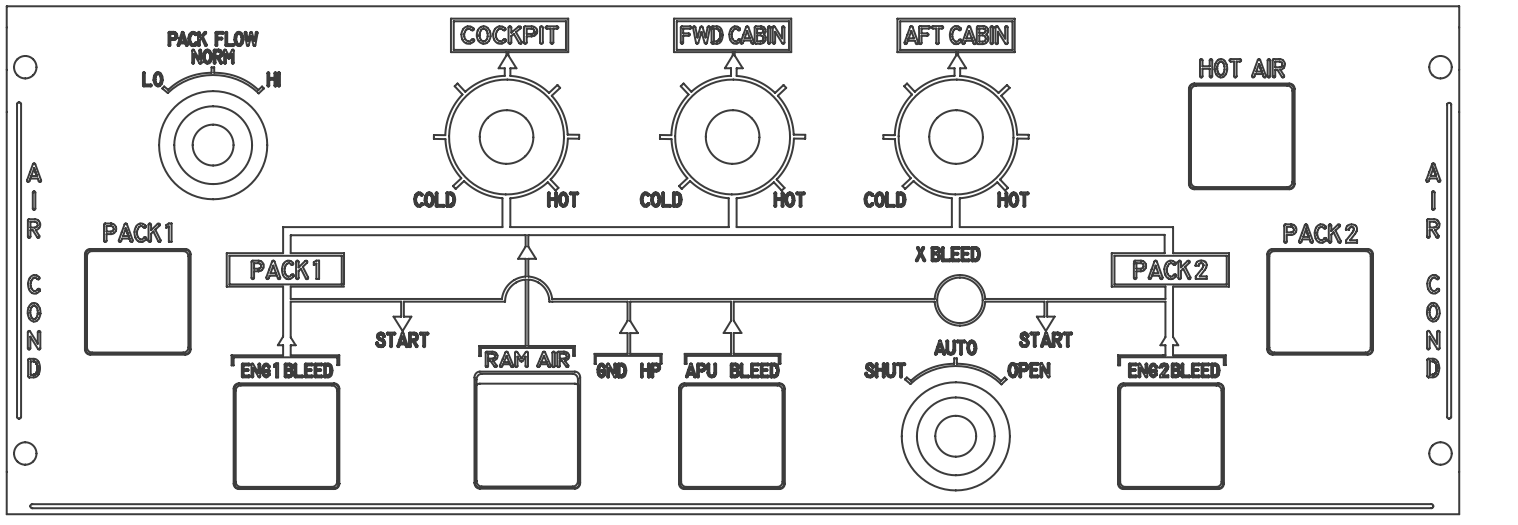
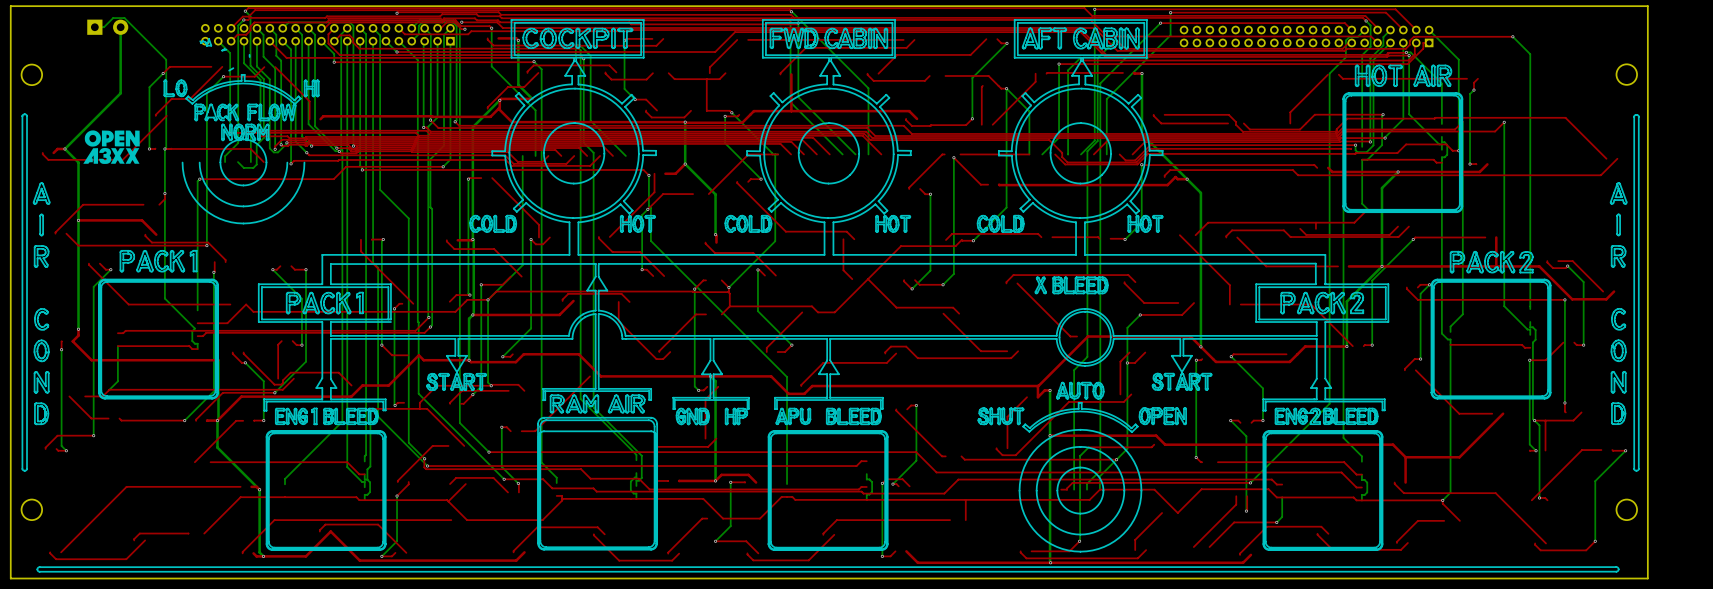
line: (6, 6) (6, 514) (1459, 514) (1459, 6) (6, 6) -> none
board edge: none -> (10, 6) (1647, 6) (1647, 578) (10, 578) (10, 6)
top track: none -> (1094, 9) (1395, 9) (1416, 30)
bottom track: none -> (1094, 9) (1094, 140) (1080, 154)
via: none -> (1094, 9)
top track: none -> (245, 11) (248, 8) (1084, 8) (1092, 15) (1365, 15) (1377, 30)
bottom track: none -> (245, 11) (250, 16) (250, 65) (263, 79) (263, 137) (256, 145) (256, 164) (253, 167) (243, 167) (237, 162)
via: none -> (245, 11)
top track: none -> (791, 11) (789, 10) (255, 10) (248, 16) (242, 16) (231, 28)
bottom track: none -> (791, 11) (868, 88) (868, 154)
via: none -> (791, 11)
top track: none -> (397, 13) (791, 14) (794, 17) (1091, 17)
via: none -> (397, 13)
top track: none -> (1170, 12) (1385, 12) (1403, 30)
bottom track: none -> (1170, 12) (1170, 35) (1106, 99) (1106, 154)
via: none -> (1170, 12)
top track: none -> (1091, 17) (1363, 17) (1366, 20)
top track: none -> (327, 18) (441, 18)
top track: none -> (243, 19) (250, 17) (325, 17) (327, 16) (440, 16) (442, 14) (476, 14) (478, 16) (499, 16) (501, 18) (1090, 19) (1107, 36) (1371, 36) (1377, 42)
bottom track: none -> (243, 19) (238, 25) (238, 143) (225, 156) (225, 162)
via: none -> (243, 19)
top track: none -> (630, 20) (790, 21)
bottom track: none -> (790, 21) (790, 102) (842, 154)
bottom track: none -> (1366, 20) (1370, 25) (1370, 46) (1362, 55) (1362, 146)
via: none -> (1366, 20)
top track: none -> (461, 22) (497, 22) (502, 28) (1094, 28) (1117, 50) (1344, 50) (1346, 48) (1405, 48) (1413, 36) (1512, 36)
via: none -> (461, 22)
top track: none -> (798, 23) (631, 24) (629, 22) (500, 22) (498, 20) (476, 20) (475, 18) (254, 22) (246, 34) (237, 34) (231, 41)
bottom track: none -> (798, 23) (798, 97) (855, 154)
top track: none -> (1160, 23) (1344, 23) (1351, 30)
bottom track: none -> (1160, 23) (1100, 83) (1100, 470) (1087, 483) (1087, 489)
via: none -> (1160, 23)
bottom track: none -> (94, 27) (104, 27) (113, 18) (124, 18) (166, 59) (164, 298) (194, 328) (192, 331) (192, 341) (197, 343) (197, 349)
part: none -> (107, 27)
bottom track: none -> (120, 27) (120, 93) (64, 148) (78, 162) (78, 329)
top track: none -> (491, 28) (489, 26) (461, 26) (455, 20) (444, 20) (442, 22) (330, 22) (324, 28) (321, 28)
bottom track: none -> (491, 28) (491, 66) (535, 110) (535, 155)
via: none -> (491, 28)
bottom track: none -> (256, 28) (263, 34) (263, 56) (275, 68) (275, 149)
bottom track: none -> (269, 28) (276, 34) (276, 55) (281, 60) (281, 144)
bottom track: none -> (282, 28) (288, 22) (349, 22) (353, 25) (353, 146)
bottom track: none -> (295, 28) (302, 34) (302, 136) (311, 146)
bottom track: none -> (308, 28) (315, 34) (315, 126) (336, 148)
top track: none -> (334, 28) (328, 34) (328, 43) (339, 55) (579, 54) (583, 58)
bottom track: none -> (347, 28) (341, 34) (342, 421) (285, 478) (285, 484)
bottom track: none -> (360, 28) (366, 34) (364, 461)
bottom track: none -> (373, 28) (380, 35) (380, 189) (408, 218) (408, 442) (424, 458)
top track: none -> (398, 28) (404, 34) (468, 34) (471, 31) (630, 30) (1081, 30) (1106, 54) (1386, 54) (1388, 52) (1406, 52)
bottom track: none -> (411, 28) (419, 20) (453, 20) (459, 26) (459, 423) (489, 452)
bottom track: none -> (424, 28) (430, 34) (430, 120)
top track: none -> (437, 28) (440, 28) (446, 22) (454, 22) (461, 29) (464, 29)
bottom track: none -> (450, 28) (444, 34) (444, 145) (430, 159) (432, 325) (430, 327)
via: none -> (464, 29)
bottom track: none -> (1364, 30) (1357, 37) (1349, 37) (1345, 40) (1345, 57) (1329, 73) (1329, 403) (1250, 482)
bottom track: none -> (1390, 30) (1383, 37) (1383, 45) (1370, 58) (1370, 141)
bottom track: none -> (1429, 30) (1458, 59) (1458, 150)
line: (182, 31) (187, 44) (186, 46) (185, 43) (177, 45) (182, 31) -> (211, 104) (216, 118) (216, 120) (214, 117) (205, 119) (211, 104)
line: (198, 31) (199, 37) (206, 32) (202, 36) (206, 45) (201, 38) (198, 45) (198, 31) -> (229, 104) (230, 110) (237, 105) (233, 109) (237, 120) (232, 111) (230, 119) (228, 120) (229, 104)
line: (216, 31) (223, 32) (217, 33) (217, 37) (222, 38) (217, 39) (216, 46) (216, 31) -> (249, 104) (257, 105) (250, 106) (250, 110) (255, 112) (250, 113) (249, 120) (249, 104)
line: (245, 31) (247, 45) (251, 36) (254, 45) (257, 32) (254, 40) (250, 32) (247, 40) (245, 31) -> (281, 104) (283, 120) (285, 119) (288, 109) (292, 120) (295, 104) (293, 105) (291, 114) (287, 104) (284, 114) (281, 104)
part: none -> (327, 34)
line: (170, 33) (174, 34) (175, 37) (170, 38) (170, 33) -> (197, 106) (202, 107) (202, 110) (197, 111) (197, 106)
line: (196, 33) (191, 32) (188, 37) (189, 44) (194, 45) -> (226, 106) (221, 104) (217, 110) (219, 118) (224, 120)
line: (196, 33) (191, 34) (190, 39) (192, 43) (195, 42) (196, 43) -> (226, 106) (225, 108) (221, 107) (219, 112) (221, 117) (226, 116) (226, 118)
part: none -> (1306, 36)
bottom track: none -> (1512, 36) (1530, 54) (1530, 309)
via: none -> (1512, 36)
top track: none -> (487, 38) (493, 45) (580, 45) (656, 45) (663, 38)
top track: none -> (498, 38) (516, 38) (518, 40)
top track: none -> (652, 38) (626, 38) (624, 40)
top track: none -> (986, 39) (970, 54) (897, 54) (878, 73)
top track: none -> (997, 39) (1001, 43) (1006, 43)
bottom track: none -> (518, 40) (518, 84) (532, 98)
via: none -> (518, 40)
bottom track: none -> (624, 40) (624, 88) (635, 99)
via: none -> (624, 40)
top track: none -> (737, 39) (709, 67) (709, 73)
top track: none -> (748, 39) (903, 39)
top track: none -> (914, 39) (906, 47) (805, 47) (780, 74)
top track: none -> (1116, 39) (1125, 48) (1342, 48) (1348, 42) (1351, 42)
bottom track: none -> (1116, 39) (1097, 58) (1097, 141) (1087, 151) (1087, 356) (1074, 370) (1074, 489)
line: (177, 37) (175, 32) (168, 32) (168, 45) (170, 40) (175, 39) -> (204, 110) (203, 105) (195, 104) (195, 120) (197, 113) (203, 112)
bottom track: none -> (218, 41) (230, 53) (230, 133)
bottom track: none -> (244, 41) (244, 63) (260, 79) (260, 136)
bottom track: none -> (256, 41) (256, 66) (269, 79) (269, 148) (273, 152) (278, 152) (286, 142)
top track: none -> (269, 41) (286, 57) (575, 57)
bottom track: none -> (282, 41) (291, 49) (291, 163)
bottom track: none -> (295, 41) (295, 141) (306, 152)
bottom track: none -> (308, 41) (308, 124) (335, 151) (338, 151)
bottom track: none -> (321, 41) (334, 53) (334, 62)
top track: none -> (334, 41) (340, 35) (349, 35) (359, 48) (579, 48)
bottom track: none -> (347, 41) (347, 467) (362, 481) (364, 481) (364, 487)
bottom track: none -> (360, 41) (360, 165) (362, 169)
bottom track: none -> (373, 41) (373, 262) (378, 267) (378, 416) (427, 466)
bottom track: none -> (385, 41) (397, 52)
bottom track: none -> (398, 41) (417, 60) (418, 393) (504, 479)
bottom track: none -> (411, 41) (418, 34) (418, 25) (422, 22) (452, 22) (456, 26) (455, 121)
bottom track: none -> (424, 41) (423, 127)
bottom track: none -> (437, 41) (437, 117) (428, 126) (428, 317)
bottom track: none -> (450, 41) (450, 159) (443, 166)
bottom track: none -> (1006, 43) (972, 77) (972, 118)
via: none -> (1006, 43)
bottom track: none -> (1390, 42) (1373, 59) (1373, 145) (1366, 152) (1357, 152) (1355, 145)
bottom track: none -> (1403, 42) (1403, 119) (1385, 138)
top track: none -> (1416, 42) (1414, 54) (1408, 60) (1082, 60) (1080, 58)
top track: none -> (1429, 42) (1423, 42) (1423, 48) (1407, 64) (1059, 64)
line: (237, 42) (239, 44) (241, 41) (239, 33) (236, 37) (237, 42) -> (272, 117) (275, 118) (277, 115) (274, 106) (271, 110) (272, 117)
line: (235, 43) (235, 35) (239, 32) (243, 36) (242, 42) (239, 46) (235, 43) -> (270, 117) (270, 108) (275, 104) (279, 109) (279, 116) (275, 120) (270, 117)
bottom track: none -> (579, 48) (580, 50) (580, 399) (636, 454) (636, 460)
line: (234, 45) (225, 45) (225, 31) (227, 44) (234, 45) -> (269, 119) (259, 120) (259, 104) (261, 118) (269, 119)
top track: none -> (397, 52) (715, 52) (735, 32) (1080, 32) (1105, 56) (1409, 55)
via: none -> (397, 52)
bottom track: none -> (1406, 52) (1410, 52) (1441, 83) (1441, 123)
via: none -> (1406, 52)
line: (200, 49) (200, 63) (194, 53) (192, 63) (192, 50) (199, 59) (200, 49) -> (230, 124) (231, 139) (223, 129) (222, 140) (222, 125) (229, 135) (230, 124)
line: (214, 49) (221, 51) (222, 55) (219, 57) (221, 63) (217, 57) (213, 63) (214, 49) -> (247, 124) (255, 127) (255, 131) (252, 133) (254, 140) (249, 133) (248, 133) (247, 139) (246, 139) (247, 124)
line: (224, 49) (228, 55) (233, 50) (233, 63) (231, 54) (228, 58) (225, 54) (225, 62) (224, 63) (224, 49) -> (258, 124) (263, 131) (268, 124) (268, 140) (266, 129) (263, 134) (259, 129) (259, 139) (258, 139) (258, 124)
bottom track: none -> (1409, 55) (1409, 114) (1439, 144) (1441, 144) (1441, 149)
via: none -> (1409, 55)
line: (215, 51) (215, 55) (220, 55) (219, 51) (215, 51) -> (248, 126) (248, 131) (253, 130) (252, 127) (248, 126)
bottom track: none -> (575, 57) (577, 45) (580, 45) (590, 55) (590, 120) (625, 155)
bottom track: none -> (1080, 58) (1068, 70) (1068, 154)
bottom track: none -> (583, 58) (583, 142) (593, 152) (593, 407) (641, 455) (641, 477) (636, 480) (636, 485)
via: none -> (583, 58)
line: (25, 55) (33, 59) (36, 67) (33, 75) (25, 78) (17, 75) (14, 67) (17, 59) (25, 55) -> none
top track: none -> (534, 61) (334, 62)
bottom track: none -> (534, 61) (541, 69) (541, 462) (556, 477) (556, 483)
via: none -> (534, 61)
line: (1440, 55) (1448, 59) (1451, 67) (1448, 75) (1440, 78) (1432, 75) (1429, 67) (1432, 59) (1440, 55) -> none
via: none -> (334, 62)
bottom track: none -> (1059, 64) (1059, 137) (1042, 154)
via: none -> (1059, 64)
round board edge: none -> [1616, 64, 1638, 86]
round board edge: none -> [21, 64, 43, 86]
top track: none -> (211, 66) (169, 66) (163, 73)
top track: none -> (222, 66) (190, 99) (171, 99) (155, 115)
line: (205, 60) (204, 54) (207, 51) (209, 58) (208, 61) (205, 60) -> (237, 136) (236, 130) (239, 126) (241, 134) (239, 138) (237, 136)
top track: none -> (264, 67) (254, 76) (223, 76)
top track: none -> (275, 67) (309, 101) (309, 119)
line: (204, 61) (203, 52) (208, 49) (211, 53) (211, 60) (208, 63) (204, 61) -> (235, 137) (234, 128) (240, 124) (243, 129) (243, 136) (239, 140) (235, 137)
top track: none -> (538, 72) (524, 87) (507, 87) (487, 108)
top track: none -> (605, 72) (611, 79) (646, 79) (652, 73)
top track: none -> (616, 72) (609, 65) (533, 65) (527, 72)
top track: none -> (668, 73) (674, 79) (719, 79) (725, 73)
top track: none -> (1122, 72) (1046, 73)
top track: none -> (1133, 72) (1141, 73)
bottom track: none -> (163, 73) (149, 87) (149, 148)
via: none -> (163, 73)
top track: none -> (867, 73) (873, 80) (924, 80) (929, 75)
top track: none -> (1035, 73) (1035, 81) (992, 124)
bottom track: none -> (1141, 73) (1141, 134) (1200, 192) (1200, 346)
via: none -> (1141, 73)
top track: none -> (791, 74) (791, 111)
top track: none -> (1327, 74) (1290, 112) (1290, 123)
top track: none -> (1338, 74) (1342, 78) (1467, 78)
bottom track: none -> (223, 76) (206, 93) (206, 245)
via: none -> (223, 76)
top track: none -> (945, 75) (988, 75) (1001, 88) (1006, 88)
top track: none -> (1477, 78) (1474, 82) (1474, 90)
top track: none -> (706, 79) (706, 110) (729, 110) (731, 112)
top track: none -> (982, 85) (981, 124)
via: none -> (1006, 88)
bottom track: none -> (1474, 90) (1470, 94) (1470, 164)
via: none -> (1474, 90)
top track: none -> (532, 98) (501, 98) (499, 107) (490, 116) (323, 116) (320, 119)
bottom track: none -> (499, 100) (472, 127) (473, 314) (469, 318) (469, 360)
via: none -> (499, 100)
top track: none -> (635, 99) (646, 99) (657, 110)
via: none -> (635, 99)
top track: none -> (498, 108) (512, 122) (742, 122) (753, 111) (909, 111) (917, 118)
top track: none -> (646, 110) (651, 117) (684, 117) (691, 110)
bottom track: none -> (731, 112) (772, 154) (778, 154)
via: none -> (731, 112)
top track: none -> (739, 114) (725, 116)
top track: none -> (1153, 114) (1161, 123) (1228, 123)
top track: none -> (1164, 114) (1228, 114) (1242, 131) (1335, 131) (1347, 118) (1565, 117) (1606, 158)
top track: none -> (1383, 114) (1314, 114) (1300, 129) (1249, 129) (1243, 123)
bottom track: none -> (1383, 114) (1382, 145) (1367, 159) (1362, 159) (1362, 203) (1367, 209)
via: none -> (1383, 114)
top track: none -> (166, 115) (122, 159) (48, 159) (42, 152)
bottom track: none -> (725, 116) (725, 143) (761, 179)
via: none -> (725, 116)
top track: none -> (972, 118) (966, 125) (930, 125) (911, 125) (906, 118)
via: none -> (972, 118)
top track: none -> (430, 120) (438, 128) (867, 128) (875, 136) (1337, 136) (1345, 129) (1455, 129) (1462, 121)
via: none -> (430, 120)
bottom track: none -> (1462, 121) (1462, 314) (1450, 326) (1450, 331)
top track: none -> (455, 121) (459, 125) (903, 125) (912, 133) (1336, 133) (1343, 126)
via: none -> (455, 121)
bottom track: none -> (685, 122) (685, 164) (715, 194) (715, 234)
via: none -> (685, 122)
top track: none -> (1504, 122) (1495, 131) (1345, 131) (1338, 138) (872, 138) (866, 131) (430, 131) (423, 127)
bottom track: none -> (1504, 122) (1504, 306) (1527, 329) (1530, 329) (1530, 334)
via: none -> (1504, 122)
bottom track: none -> (1343, 126) (1343, 437) (1361, 456) (1361, 461)
via: none -> (423, 127)
drawing: none -> [83, 130, 140, 164]
top track: none -> (256, 129) (426, 130) (429, 133) (864, 133) (870, 140) (1049, 140) (1062, 152) (1062, 157) (1067, 162) (1136, 162) (1150, 148) (1351, 148)
bottom track: none -> (256, 129) (250, 135) (250, 162)
top track: none -> (230, 133) (415, 132) (418, 135) (862, 135) (881, 154)
top track: none -> (260, 136) (287, 136) (289, 138) (813, 137) (829, 154)
bottom track: none -> (1441, 136) (1441, 142) (1447, 144) (1447, 154) (1441, 157) (1441, 333) (1447, 339) (1450, 339) (1450, 492) (1442, 500)
top track: none -> (1385, 138) (1341, 138) (1339, 140) (1108, 140) (1093, 154)
via: none -> (1385, 138)
top track: none -> (1370, 141) (1144, 142) (1132, 154)
via: none -> (1370, 141)
top track: none -> (286, 142) (306, 143) (309, 141) (791, 141) (803, 154)
via: none -> (286, 142)
top track: none -> (281, 144) (307, 145) (309, 143) (780, 143) (791, 154)
via: none -> (281, 144)
top track: none -> (1355, 145) (1150, 145) (1135, 160) (1125, 160) (1119, 154)
via: none -> (1355, 145)
top track: none -> (311, 146) (348, 145) (352, 149) (356, 147) (579, 148) (587, 155)
via: none -> (311, 146)
top track: none -> (353, 146) (602, 145) (612, 155)
via: none -> (353, 146)
top track: none -> (155, 148) (149, 148)
top track: none -> (336, 148) (348, 148) (351, 151) (357, 149) (555, 150) (561, 155)
via: none -> (336, 148)
top track: none -> (64, 148) (57, 148) (53, 152)
via: none -> (64, 148)
via: none -> (149, 148)
top track: none -> (164, 148) (250, 148) (263, 162)
via: none -> (164, 148)
top track: none -> (275, 149) (275, 146) (281, 139) (307, 139) (802, 139) (816, 154)
via: none -> (275, 149)
top track: none -> (1458, 150) (1452, 150) (1446, 144) (1406, 144) (1397, 153) (1148, 153) (1137, 164) (1065, 164) (1055, 154)
via: none -> (1458, 150)
top track: none -> (339, 151) (341, 153) (356, 153) (358, 151) (507, 152) (517, 161) (542, 161) (548, 155)
via: none -> (339, 151)
top track: none -> (306, 152) (309, 155) (505, 155) (513, 163) (566, 163) (574, 155)
via: none -> (306, 152)
bottom track: none -> (775, 154) (775, 241) (728, 287)
top track: none -> (778, 154) (748, 154) (708, 194)
top track: none -> (944, 154) (942, 154) (909, 188)
top track: none -> (960, 154) (1029, 154)
bottom track: none -> (1029, 154) (1029, 111) (1006, 88) (1006, 207) (973, 240)
bottom track: none -> (522, 155) (522, 265) (488, 299) (488, 382) (491, 385)
top track: none -> (600, 155) (590, 165) (511, 165) (505, 159) (339, 159) (294, 160) (291, 163)
top track: none -> (953, 157) (980, 184) (988, 184)
bottom track: none -> (953, 157) (953, 273) (943, 284)
via: none -> (953, 157)
top track: none -> (1617, 158) (1600, 175) (1298, 175) (1292, 170) (1170, 170) (1164, 177)
top track: none -> (1362, 159) (1433, 159) (1436, 162) (1441, 162)
line: (159, 145) (163, 124) (174, 106) (192, 95) (213, 91) (234, 95) (251, 106) (263, 124) (267, 145) -> none
line: (174, 145) (177, 130) (185, 117) (198, 109) (213, 106) (228, 109) (240, 117) (249, 130) (252, 145) -> none
via: none -> (291, 163)
top track: none -> (685, 164) (675, 173) (665, 173)
via: none -> (685, 164)
top track: none -> (1470, 164) (1476, 164)
via: none -> (1470, 164)
top track: none -> (1487, 164) (1479, 171) (1332, 171) (1328, 167)
top track: none -> (1141, 164) (1314, 165) (1317, 167)
bottom track: none -> (1141, 164) (1141, 222) (1125, 239)
via: none -> (1141, 164)
top track: none -> (443, 166) (346, 166) (333, 179) (199, 179)
via: none -> (443, 166)
top track: none -> (362, 169) (643, 169) (648, 175)
via: none -> (362, 169)
bottom track: none -> (1398, 171) (1381, 188) (1381, 266) (1346, 301) (1346, 346)
via: none -> (1398, 171)
top track: none -> (654, 173) (654, 192) (609, 236)
bottom track: none -> (648, 175) (650, 240) (787, 377) (787, 484)
via: none -> (648, 175)
top track: none -> (481, 178) (468, 179)
top track: none -> (492, 178) (538, 224) (538, 237)
bottom track: none -> (199, 179) (197, 181) (197, 310)
via: none -> (199, 179)
bottom track: none -> (468, 179) (469, 295)
via: none -> (468, 179)
top track: none -> (761, 179) (750, 179) (748, 181)
via: none -> (761, 179)
top track: none -> (1187, 179) (1177, 179) (1175, 177) (1167, 185) (999, 184)
via: none -> (1187, 179)
top track: none -> (737, 181) (785, 231) (846, 231) (854, 239)
top track: none -> (920, 188) (925, 194) (930, 194)
top track: none -> (164, 193) (164, 199) (159, 204)
via: none -> (164, 193)
top track: none -> (693, 194) (663, 194) (647, 209)
bottom track: none -> (930, 194) (930, 270) (912, 288)
via: none -> (930, 194)
top track: none -> (143, 204) (83, 204) (55, 233)
bottom track: none -> (647, 209) (642, 215) (642, 269)
via: none -> (647, 209)
top track: none -> (1367, 209) (1354, 222) (1208, 222) (1195, 235)
top track: none -> (78, 220) (142, 220) (156, 234)
via: none -> (78, 220)
top track: none -> (1315, 222) (1315, 228)
top track: none -> (1398, 226) (1389, 234) (1306, 234) (1300, 228)
top track: none -> (1408, 226) (1398, 237) (1290, 237) (1283, 230) (1232, 230) (1226, 237)
top track: none -> (66, 233) (78, 245) (206, 245)
top track: none -> (145, 234) (151, 242) (208, 242) (225, 262)
top track: none -> (715, 234) (716, 242)
via: none -> (715, 234)
top track: none -> (1179, 235) (1229, 285) (1229, 304)
top track: none -> (549, 237) (543, 244) (535, 244) (531, 239)
top track: none -> (598, 236) (612, 252) (640, 252) (664, 276)
top track: none -> (1041, 237) (1038, 233) (952, 233) (945, 240)
top track: none -> (1052, 237) (1099, 238)
top track: none -> (1237, 237) (1266, 266) (1338, 266)
top track: none -> (1485, 237) (1415, 237) (1413, 239)
top track: none -> (1496, 237) (1496, 266)
top track: none -> (1110, 238) (1125, 239)
top track: none -> (360, 239) (360, 251) (413, 303)
top track: none -> (383, 239) (371, 239)
bottom track: none -> (383, 239) (381, 345)
via: none -> (383, 239)
top track: none -> (472, 239) (457, 240)
via: none -> (472, 239)
bottom track: none -> (531, 239) (531, 328) (502, 356)
via: none -> (531, 239)
top track: none -> (843, 239) (843, 270) (852, 279)
via: none -> (1125, 239)
bottom track: none -> (1413, 239) (1372, 280) (1372, 345)
via: none -> (1413, 239)
top track: none -> (446, 240) (454, 249) (494, 249) (521, 276)
top track: none -> (973, 240) (961, 240) (955, 246) (901, 246) (834, 312) (818, 312) (812, 306) (729, 306)
via: none -> (973, 240)
top track: none -> (705, 242) (714, 253) (753, 253) (775, 275)
via: none -> (206, 245)
top track: none -> (1547, 261) (1552, 268) (1565, 268) (1567, 266)
top track: none -> (1558, 261) (1572, 261) (1603, 291)
top track: none -> (214, 262) (213, 272)
top track: none -> (88, 263) (128, 304) (230, 304)
top track: none -> (99, 263) (105, 269) (110, 269)
top track: none -> (280, 266) (276, 269) (272, 269)
top track: none -> (291, 266) (294, 269) (306, 269)
top track: none -> (1348, 266) (1539, 266) (1572, 299) (1606, 299) (1614, 291)
via: none -> (1381, 266)
bottom track: none -> (1567, 266) (1583, 282) (1583, 345)
via: none -> (1567, 266)
bottom track: none -> (110, 269) (93, 286) (93, 435)
via: none -> (110, 269)
bottom track: none -> (272, 269) (301, 298) (301, 345)
via: none -> (272, 269)
bottom track: none -> (306, 269) (306, 361) (274, 392)
via: none -> (306, 269)
top track: none -> (642, 269) (646, 269) (653, 276)
via: none -> (642, 269)
top track: none -> (757, 269) (764, 275)
bottom track: none -> (757, 269) (757, 311) (791, 345)
via: none -> (757, 269)
bottom track: none -> (213, 272) (213, 391) (184, 420)
via: none -> (213, 272)
top track: none -> (510, 276) (502, 284) (481, 284)
top track: none -> (868, 279) (896, 307) (953, 307) (959, 313)
top track: none -> (706, 280) (703, 280) (694, 289)
top track: none -> (721, 280) (728, 287) (728, 292)
top track: none -> (904, 280) (912, 288)
top track: none -> (915, 280) (919, 284) (943, 284)
top track: none -> (1124, 282) (1144, 303) (1178, 303)
top track: none -> (1135, 282) (1128, 275) (1013, 275) (1006, 283)
top track: none -> (1017, 283) (1070, 336) (1077, 336)
bottom track: none -> (481, 284) (481, 386) (472, 394)
via: none -> (481, 284)
via: none -> (943, 284)
top track: none -> (1429, 284) (1420, 284) (1417, 287)
bottom track: none -> (1429, 284) (1420, 293) (1420, 359)
via: none -> (1429, 284)
via: none -> (728, 287)
top track: none -> (1406, 287) (1417, 299) (1564, 299)
bottom track: none -> (694, 289) (694, 386) (698, 390)
via: none -> (694, 289)
via: none -> (912, 288)
top track: none -> (728, 292) (496, 291) (488, 299) (467, 299) (455, 311) (253, 311) (246, 304) (227, 323) (197, 323)
top track: none -> (728, 292) (729, 306)
top track: none -> (469, 295) (456, 295) (449, 301)
via: none -> (469, 295)
via: none -> (488, 299)
bottom track: none -> (1564, 299) (1564, 402)
via: none -> (1564, 299)
top track: none -> (562, 300) (568, 293) (621, 293) (629, 301)
top track: none -> (573, 300) (559, 314) (472, 314)
top track: none -> (618, 301) (618, 321) (656, 359) (663, 359) (670, 352)
top track: none -> (1194, 303) (1182, 314) (1140, 314)
top track: none -> (402, 303) (399, 303) (394, 308)
top track: none -> (1240, 304) (1311, 304) (1352, 346)
top track: none -> (729, 306) (721, 314)
bottom track: none -> (394, 308) (395, 405)
via: none -> (394, 308)
top track: none -> (802, 312) (766, 347) (766, 352)
top track: none -> (706, 314) (695, 314) (659, 352)
top track: none -> (943, 313) (981, 351) (1007, 351)
via: none -> (472, 314)
bottom track: none -> (1140, 314) (1127, 327) (1127, 448) (1099, 476) (1099, 489)
via: none -> (1140, 314)
top track: none -> (428, 317) (415, 330) (125, 330) (123, 333) (117, 333)
via: none -> (428, 317)
bottom track: none -> (1530, 321) (1530, 327) (1535, 330) (1535, 339) (1532, 342) (1532, 418) (1539, 425) (1539, 497)
top track: none -> (430, 327) (424, 332) (206, 332) (202, 336) (197, 336)
via: none -> (430, 327)
top track: none -> (78, 329) (78, 335) (72, 341) (91, 360) (218, 360)
via: none -> (78, 329)
top track: none -> (61, 341) (61, 349)
top track: none -> (281, 341) (278, 344) (278, 378)
top track: none -> (292, 341) (296, 345) (301, 345)
top track: none -> (1563, 342) (1545, 360) (1529, 360)
top track: none -> (1574, 342) (1576, 345) (1583, 345)
top track: none -> (1450, 344) (1521, 344) (1524, 347) (1530, 347)
via: none -> (301, 345)
top track: none -> (381, 345) (392, 355) (407, 355)
via: none -> (381, 345)
top track: none -> (791, 345) (785, 352) (777, 352)
via: none -> (791, 345)
top track: none -> (1372, 345) (1363, 346)
via: none -> (1372, 345)
via: none -> (1583, 345)
top track: none -> (117, 346) (189, 346) (192, 349) (197, 349)
bottom track: none -> (117, 346) (117, 381) (108, 390)
via: none -> (1200, 346)
top track: none -> (1346, 346) (1305, 346) (1289, 361) (1215, 361) (1190, 336) (1087, 336) (1038, 386) (812, 386) (804, 393) (788, 393) (771, 376) (600, 376) (578, 354) (523, 354) (515, 362) (423, 360) (418, 355) (388, 385) (362, 385) (351, 396) (241, 396) (217, 420) (207, 420)
via: none -> (1346, 346)
bottom track: none -> (61, 349) (61, 445) (66, 450)
via: none -> (61, 349)
top track: none -> (1018, 351) (1011, 358) (917, 358) (906, 346) (890, 346) (885, 353)
top track: none -> (232, 352) (241, 362) (245, 362)
top track: none -> (243, 352) (274, 384) (281, 384) (290, 372) (338, 372) (351, 385)
top track: none -> (1129, 352) (1120, 361) (1120, 394)
top track: none -> (1145, 352) (1134, 362) (1127, 362)
top track: none -> (896, 353) (886, 362) (823, 362) (801, 386)
top track: none -> (512, 354) (510, 356) (502, 356)
top track: none -> (1286, 354) (1233, 354) (1231, 356)
via: none -> (502, 356)
bottom track: none -> (1231, 356) (1262, 388) (1262, 420)
via: none -> (1231, 356)
top track: none -> (1202, 359) (1196, 360)
top track: none -> (1420, 359) (1414, 359) (1404, 370)
via: none -> (1420, 359)
bottom track: none -> (218, 360) (217, 447) (259, 489) (259, 552) (263, 556)
via: none -> (469, 360)
bottom track: none -> (1196, 360) (1196, 457)
via: none -> (1196, 360)
bottom track: none -> (1529, 360) (1529, 444) (1536, 450)
via: none -> (1529, 360)
bottom track: none -> (245, 362) (263, 381) (263, 420)
via: none -> (245, 362)
via: none -> (1127, 362)
top track: none -> (1415, 370) (1459, 413) (1492, 413)
top track: none -> (590, 376) (535, 431) (521, 431)
bottom track: none -> (710, 376) (715, 381) (715, 480)
via: none -> (710, 376)
top track: none -> (293, 378) (282, 389) (109, 389) (102, 396) (85, 396)
via: none -> (491, 385)
top track: none -> (1037, 386) (1037, 397) (1044, 390) (1050, 390)
top track: none -> (707, 386) (703, 390) (698, 390)
top track: none -> (718, 386) (705, 399) (705, 438)
top track: none -> (508, 390) (461, 390) (450, 403)
top track: none -> (524, 390) (518, 384) (436, 385) (419, 402) (419, 408)
via: none -> (698, 390)
bottom track: none -> (1050, 390) (1050, 562)
via: none -> (1050, 390)
top track: none -> (274, 392) (222, 392) (196, 420)
via: none -> (274, 392)
top track: none -> (1131, 394) (1123, 401) (1068, 401) (1015, 455) (1002, 455) (996, 448)
top track: none -> (472, 394) (463, 403) (461, 403)
via: none -> (472, 394)
top track: none -> (69, 396) (91, 418) (108, 418)
top track: none -> (1027, 397) (1007, 416) (1007, 448)
top track: none -> (404, 402) (397, 402) (395, 405)
top track: none -> (1564, 402) (1565, 412)
via: none -> (1564, 402)
via: none -> (395, 405)
top track: none -> (916, 405) (911, 405) (907, 409)
bottom track: none -> (916, 405) (916, 460) (892, 484)
via: none -> (916, 405)
top track: none -> (370, 408) (427, 408) (464, 445)
bottom track: none -> (370, 408) (370, 466) (367, 469) (367, 479)
top track: none -> (896, 409) (942, 456) (945, 456)
top track: none -> (1581, 412) (1573, 420) (1534, 420)
top track: none -> (1503, 413) (1459, 457) (1405, 457)
top track: none -> (119, 418) (121, 420) (184, 420)
via: none -> (184, 420)
via: none -> (217, 420)
top track: none -> (243, 420) (236, 420) (194, 462)
top track: none -> (263, 420) (254, 420)
via: none -> (263, 420)
top track: none -> (1230, 420) (1238, 420) (1240, 422)
bottom track: none -> (1230, 420) (1246, 436) (1246, 511)
via: none -> (1230, 420)
top track: none -> (1262, 420) (1253, 420) (1251, 422)
via: none -> (1262, 420)
via: none -> (1534, 420)
top track: none -> (1545, 420) (1545, 450)
top track: none -> (501, 427) (506, 427) (510, 431)
bottom track: none -> (501, 427) (501, 466) (518, 483)
via: none -> (501, 427)
top track: none -> (93, 435) (57, 435) (45, 449)
via: none -> (93, 435)
top track: none -> (1050, 435) (1156, 435) (1165, 444) (1393, 444) (1405, 457)
via: none -> (1050, 435)
top track: none -> (716, 438) (708, 446) (654, 446)
top track: none -> (1154, 444) (1151, 447) (1088, 447)
top track: none -> (448, 445) (432, 445) (397, 482)
bottom track: none -> (1088, 447) (1080, 456) (1079, 541)
top track: none -> (56, 449) (66, 450)
via: none -> (66, 450)
top track: none -> (1529, 450) (1536, 450)
via: none -> (1536, 450)
top track: none -> (1601, 450) (1582, 450) (1531, 500)
top track: none -> (1612, 450) (1625, 450)
bottom track: none -> (1625, 450) (1595, 481) (1595, 541)
via: none -> (1625, 450)
top track: none -> (489, 452) (916, 452) (936, 472) (1341, 472) (1356, 487) (1361, 487)
via: none -> (489, 452)
top track: none -> (961, 456) (964, 459) (1116, 459)
top track: none -> (1196, 457) (1202, 462)
via: none -> (1196, 457)
top track: none -> (1405, 457) (1405, 482)
top track: none -> (424, 458) (424, 467) (426, 469) (581, 469) (590, 478) (638, 478) (649, 489) (858, 489) (861, 487) (866, 487)
via: none -> (424, 458)
via: none -> (1116, 459)
top track: none -> (866, 461) (861, 461) (856, 466) (427, 466)
top track: none -> (210, 462) (347, 462) (359, 474) (364, 474)
top track: none -> (1217, 462) (1344, 462) (1356, 474) (1361, 474)
via: none -> (427, 466)
bottom track: none -> (636, 473) (636, 477) (630, 481) (630, 490) (636, 493) (636, 498)
bottom track: none -> (364, 474) (364, 479) (367, 479)
bottom track: none -> (866, 474) (866, 479) (872, 482) (872, 491) (866, 494) (866, 499)
bottom track: none -> (1361, 474) (1361, 479) (1367, 482) (1367, 492) (1361, 495) (1361, 500)
bottom track: none -> (367, 479) (370, 482) (370, 492) (364, 494) (364, 500)
top track: none -> (504, 479) (543, 479) (552, 488) (593, 488) (596, 491) (861, 491) (863, 493) (944, 493) (958, 479) (1271, 479) (1276, 484) (1282, 484)
via: none -> (504, 479)
top track: none -> (654, 480) (668, 480)
top track: none -> (679, 480) (715, 480) (721, 474) (748, 474) (756, 482)
via: none -> (715, 480)
top track: none -> (408, 482) (397, 496)
top track: none -> (730, 482) (745, 482)
bottom track: none -> (730, 482) (730, 526) (715, 541)
via: none -> (730, 482)
top track: none -> (518, 483) (518, 492)
via: none -> (518, 483)
top track: none -> (882, 483) (886, 479) (902, 479) (909, 486)
bottom track: none -> (882, 483) (882, 556)
via: none -> (882, 483)
top track: none -> (1250, 482) (1072, 482) (1067, 489) (1061, 489)
via: none -> (1250, 482)
top track: none -> (1394, 482) (1403, 493) (1495, 493) (1546, 543)
top track: none -> (450, 484) (456, 477) (493, 477) (508, 492)
top track: none -> (465, 484) (448, 501)
top track: none -> (892, 484) (898, 486)
via: none -> (892, 484)
top track: none -> (240, 486) (126, 486) (61, 552)
top track: none -> (251, 486) (256, 486) (259, 489)
via: none -> (259, 489)
top track: none -> (556, 495) (562, 495) (562, 498)
bottom track: none -> (397, 496) (397, 541) (381, 556)
via: none -> (397, 496)
top track: none -> (1236, 496) (1236, 504) (1193, 547)
top track: none -> (1247, 496) (1246, 511)
line: (25, 442) (17, 445) (14, 453) (17, 461) (25, 464) (33, 461) (36, 453) (33, 445) (25, 442) -> none
bottom track: none -> (1282, 497) (1282, 517) (1276, 522)
top track: none -> (1539, 497) (1545, 497) (1547, 500)
via: none -> (1539, 497)
line: (1440, 442) (1432, 445) (1429, 453) (1432, 461) (1440, 464) (1448, 461) (1451, 453) (1448, 445) (1440, 442) -> none
top track: none -> (562, 498) (542, 520) (467, 520) (447, 500) (359, 500) (356, 497) (240, 497) (204, 533)
top track: none -> (562, 498) (703, 498) (723, 518) (760, 518) (781, 496) (792, 496) (795, 499) (1089, 499) (1099, 489) (1154, 489) (1177, 513) (1201, 489) (1268, 489) (1276, 497) (1353, 497) (1356, 500) (1442, 500) (1442, 503) (1459, 520)
round board edge: none -> [21, 499, 43, 521]
top track: none -> (965, 499) (965, 520)
via: none -> (1442, 500)
round board edge: none -> [1616, 499, 1638, 521]
via: none -> (1246, 511)
top track: none -> (1162, 513) (1135, 539) (1135, 550)
top track: none -> (707, 518) (702, 518) (668, 553)
top track: none -> (451, 520) (274, 520) (242, 553)
top track: none -> (950, 520) (836, 520) (823, 534)
top track: none -> (1444, 520) (1417, 520) (1396, 542)
top track: none -> (1276, 522) (1234, 522) (1209, 547)
via: none -> (1276, 522)
top track: none -> (319, 531) (325, 524) (378, 524) (406, 552)
top track: none -> (188, 533) (139, 533) (134, 540)
top track: none -> (1317, 533) (1332, 549) (1401, 549) (1407, 542)
top track: none -> (1328, 533) (1321, 526) (1266, 526) (1240, 554)
top track: none -> (593, 534) (619, 560) (672, 560) (679, 553)
top track: none -> (604, 534) (597, 527) (537, 527) (513, 552)
top track: none -> (834, 534) (808, 560) (753, 560) (747, 553)
top track: none -> (145, 540) (126, 559) (56, 559) (50, 552)
top track: none -> (715, 541) (746, 541) (758, 553)
via: none -> (715, 541)
top track: none -> (1079, 541) (1069, 551) (1031, 551)
via: none -> (1079, 541)
top track: none -> (1595, 541) (1586, 550) (1540, 550) (1535, 543)
via: none -> (1595, 541)
top track: none -> (1146, 550) (1137, 558) (1026, 558) (1020, 551)
top track: none -> (895, 551) (890, 556) (882, 556)
top track: none -> (906, 551) (917, 562) (1243, 562) (1250, 554)
top track: none -> (395, 552) (391, 556) (381, 556)
top track: none -> (524, 552) (516, 560) (359, 560) (330, 531) (305, 556) (256, 556) (253, 553)
via: none -> (263, 556)
via: none -> (381, 556)
via: none -> (882, 556)
via: none -> (1050, 562)

